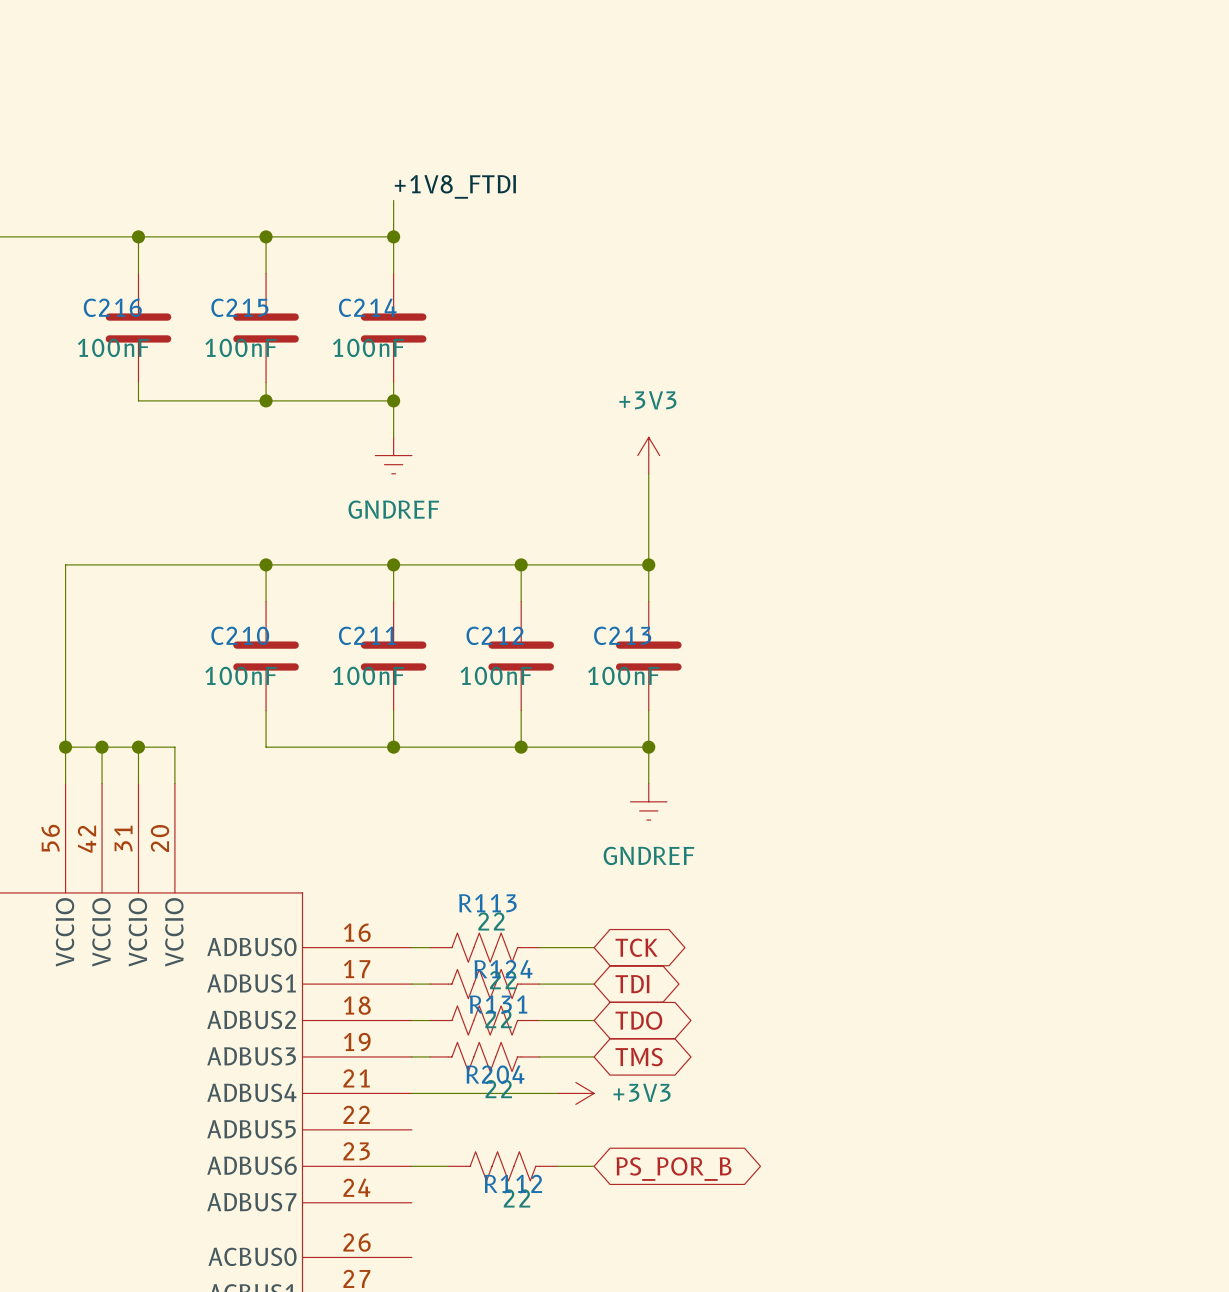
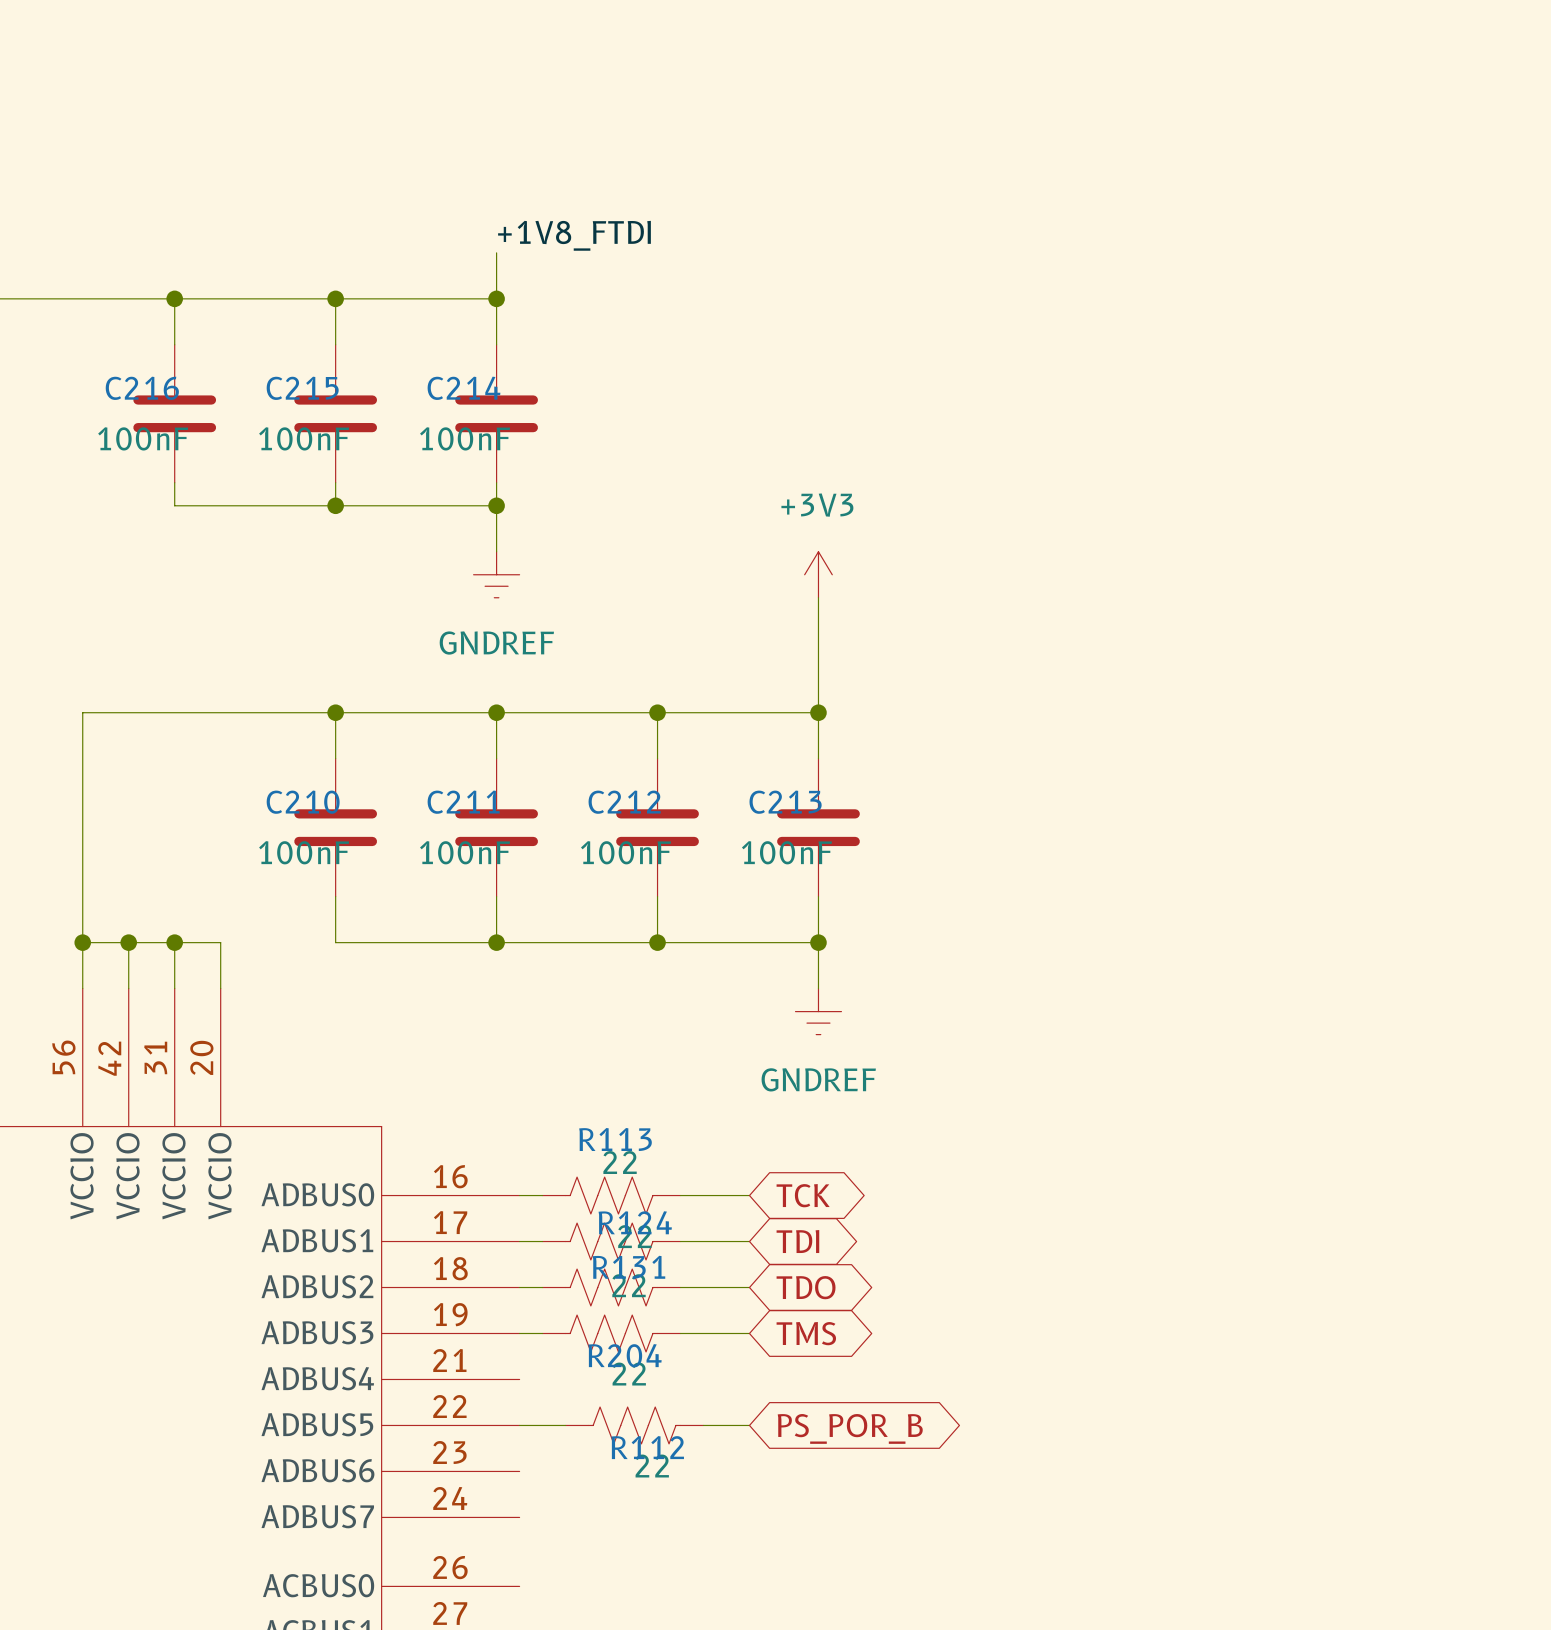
wire: (411, 1093) (557, 1093) -> none
power symbol: +3V3 (575, 1093) -> none
wire: (411, 1166) (448, 1166) -> (519, 1425) (565, 1425)
R112 position: (502, 1166) -> (634, 1425)
wire: (557, 1166) (594, 1166) -> (703, 1425) (749, 1425)
global label position: PS_POR_B (673, 1169) -> PS_POR_B (850, 1428)

